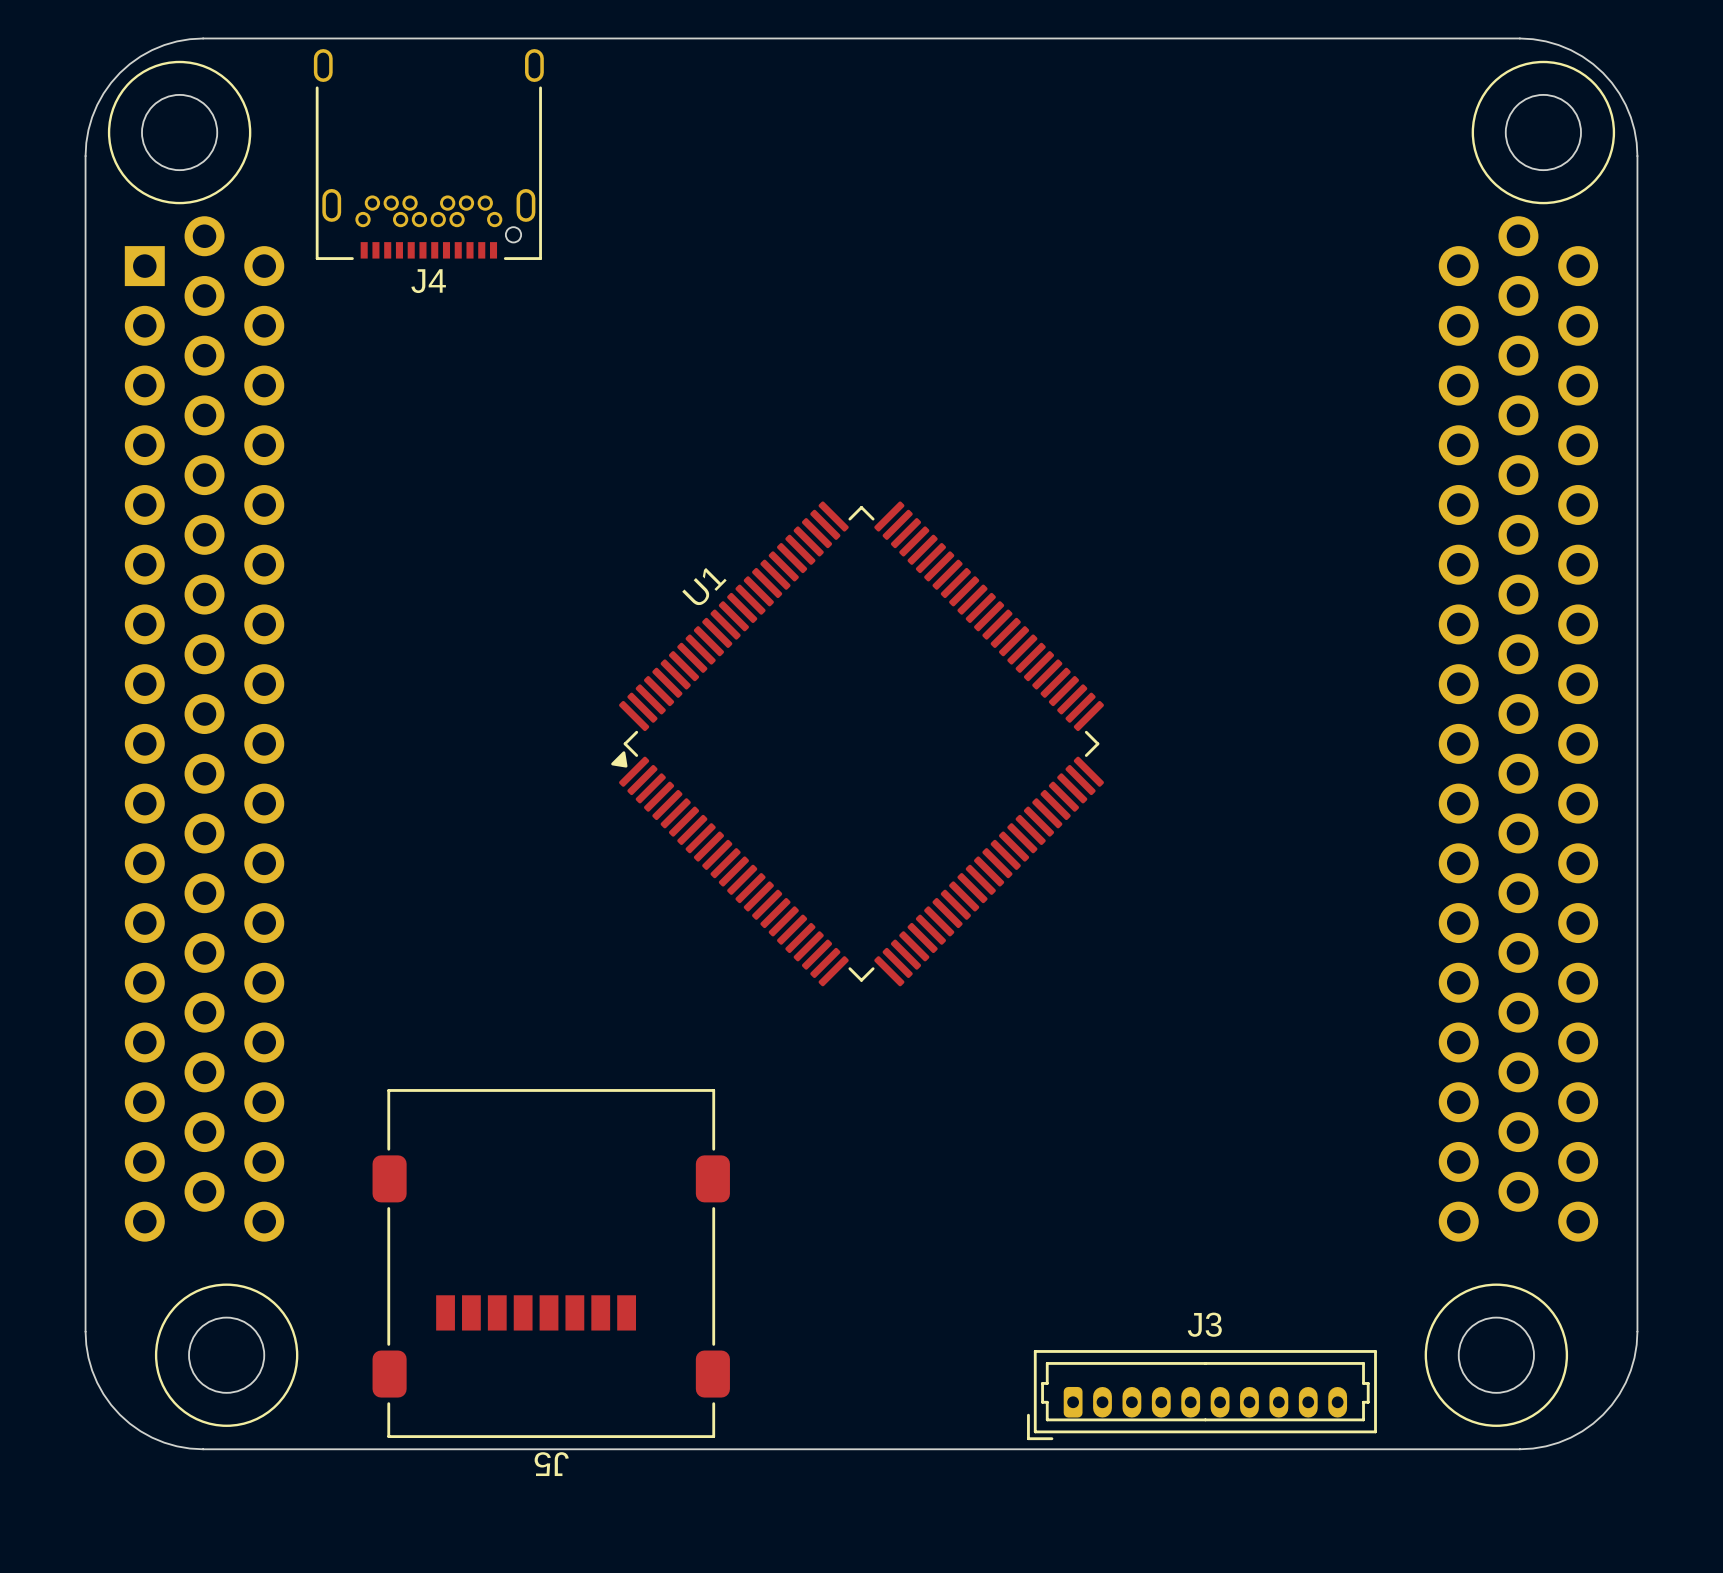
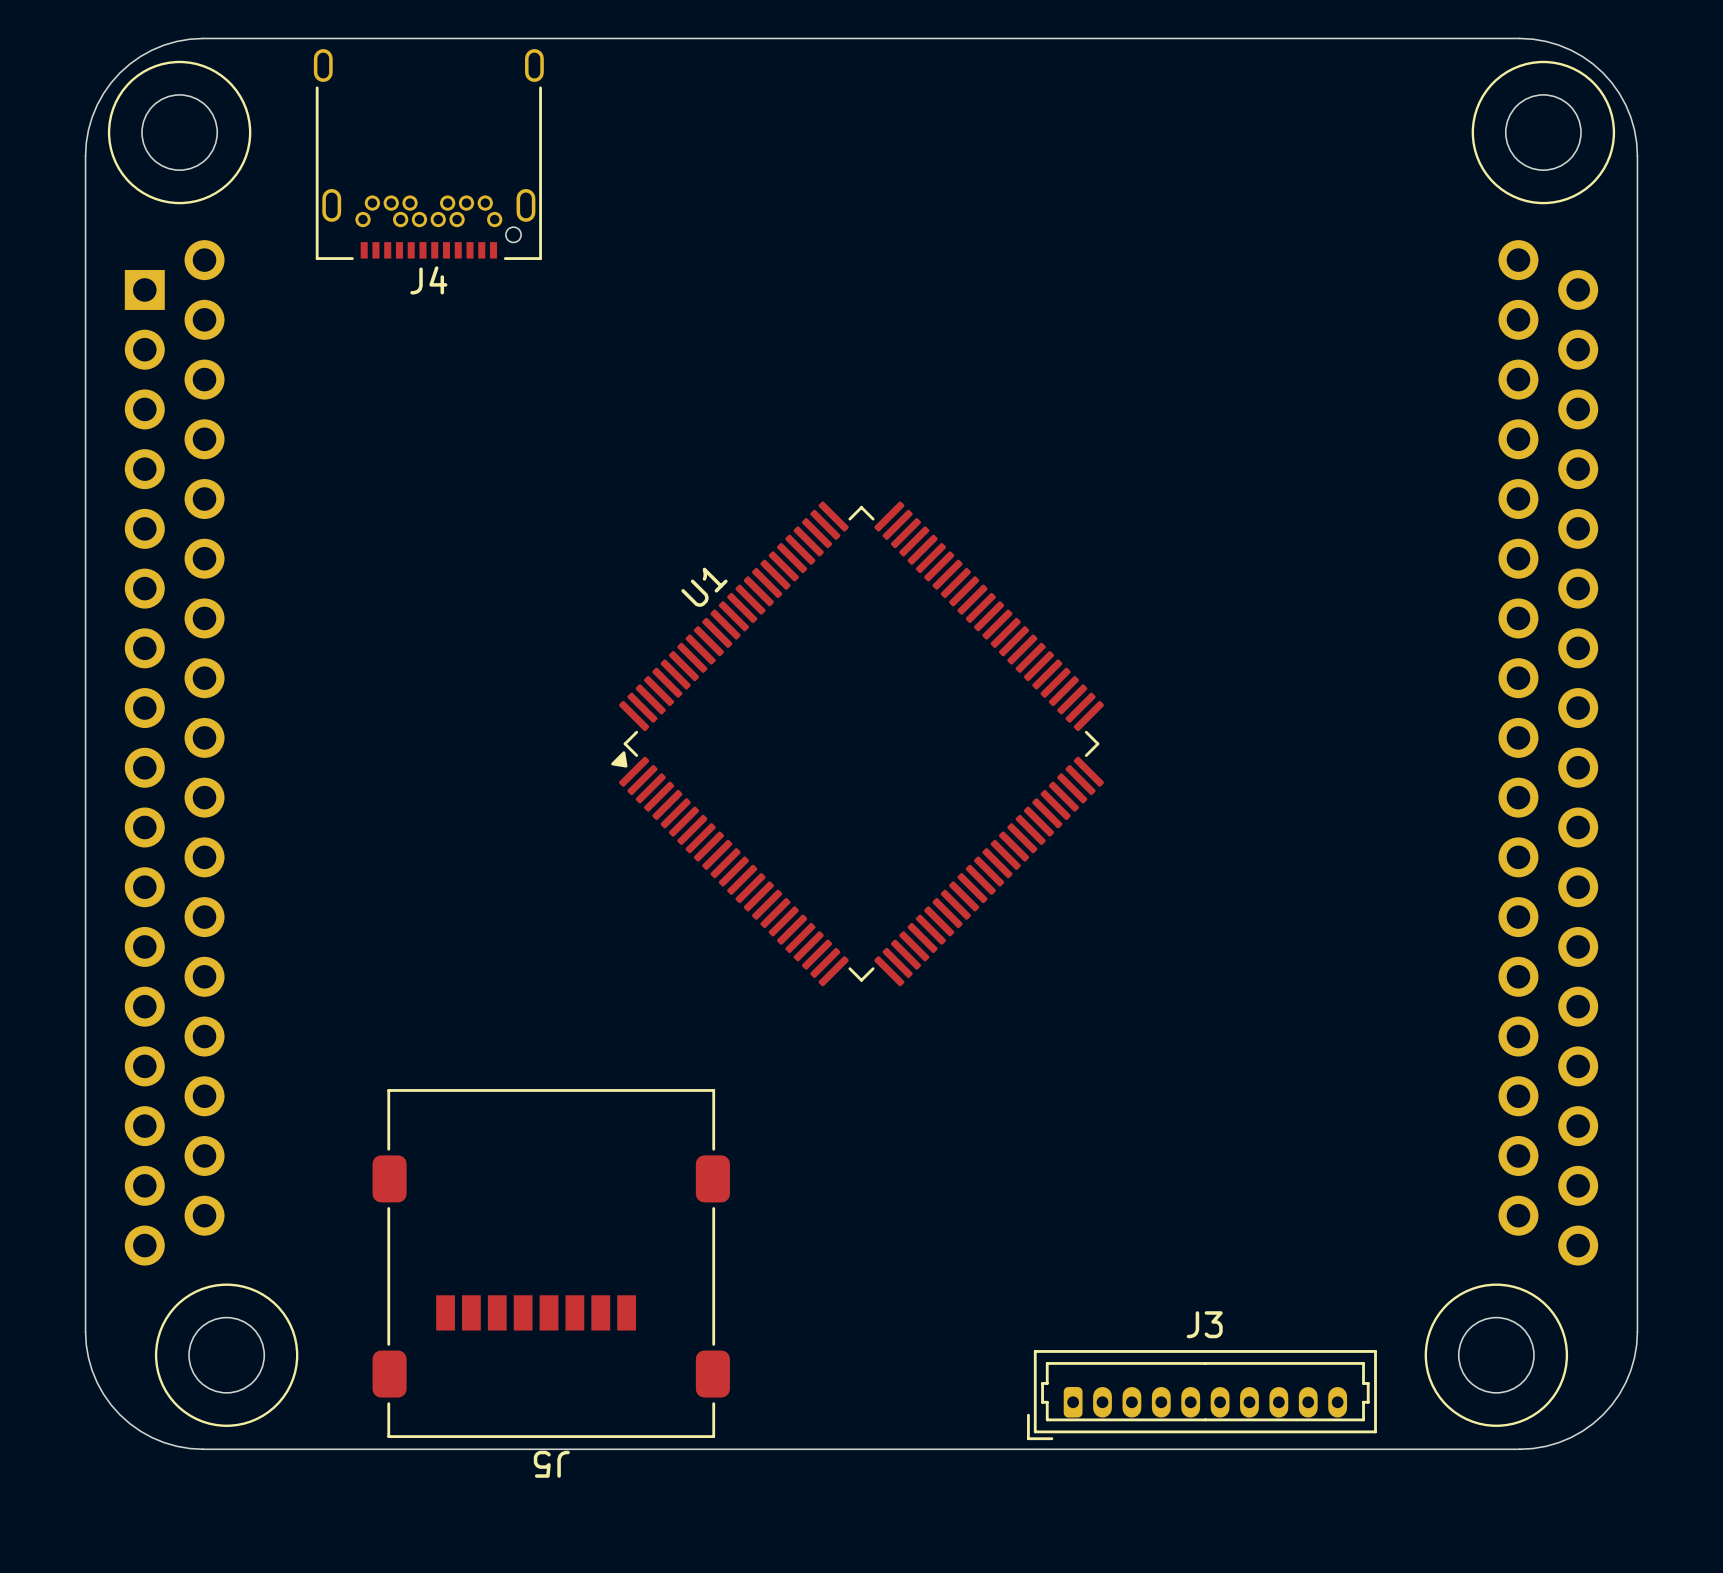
part footprint: [84, 37, 1639, 1450] -> [84, 37, 1639, 1450]

